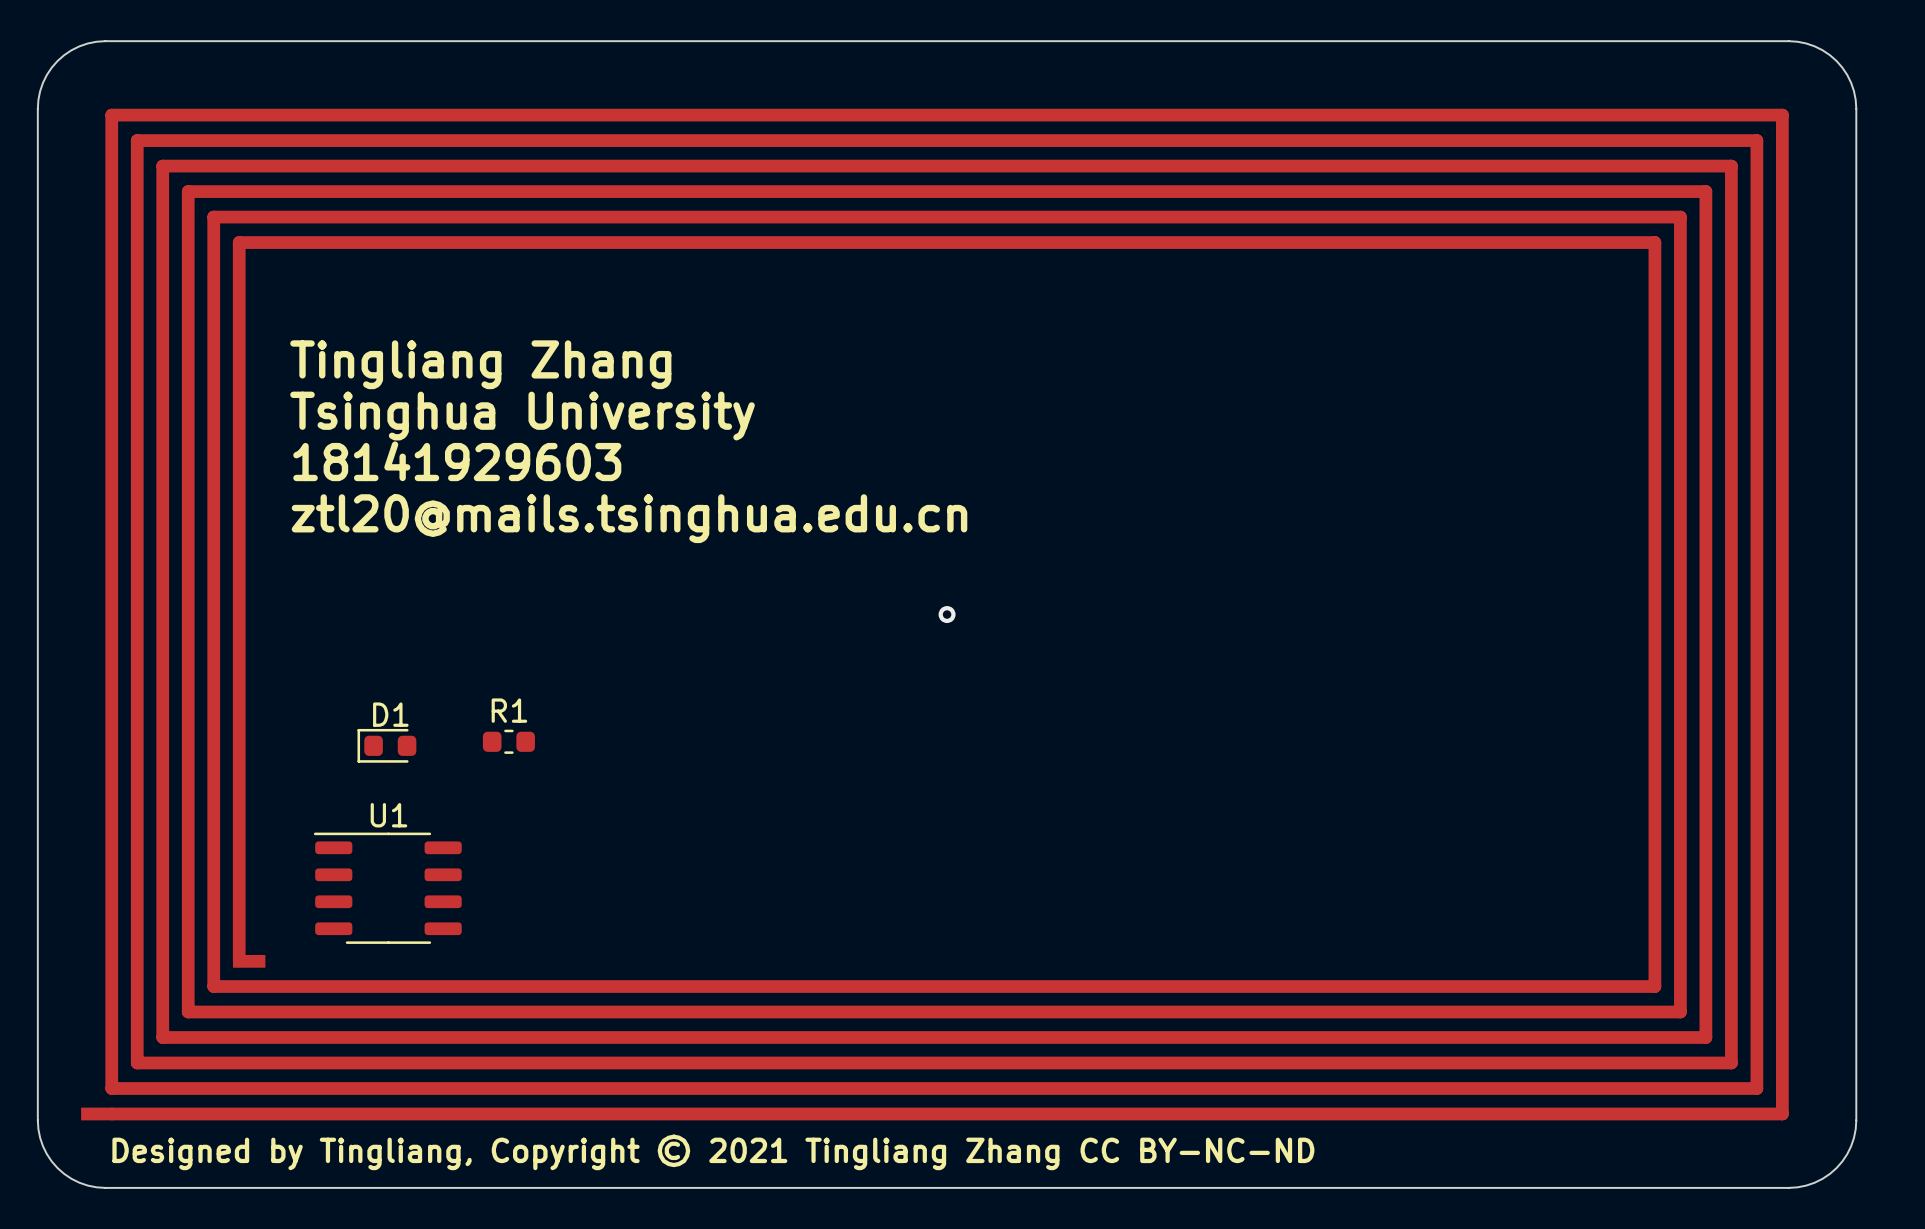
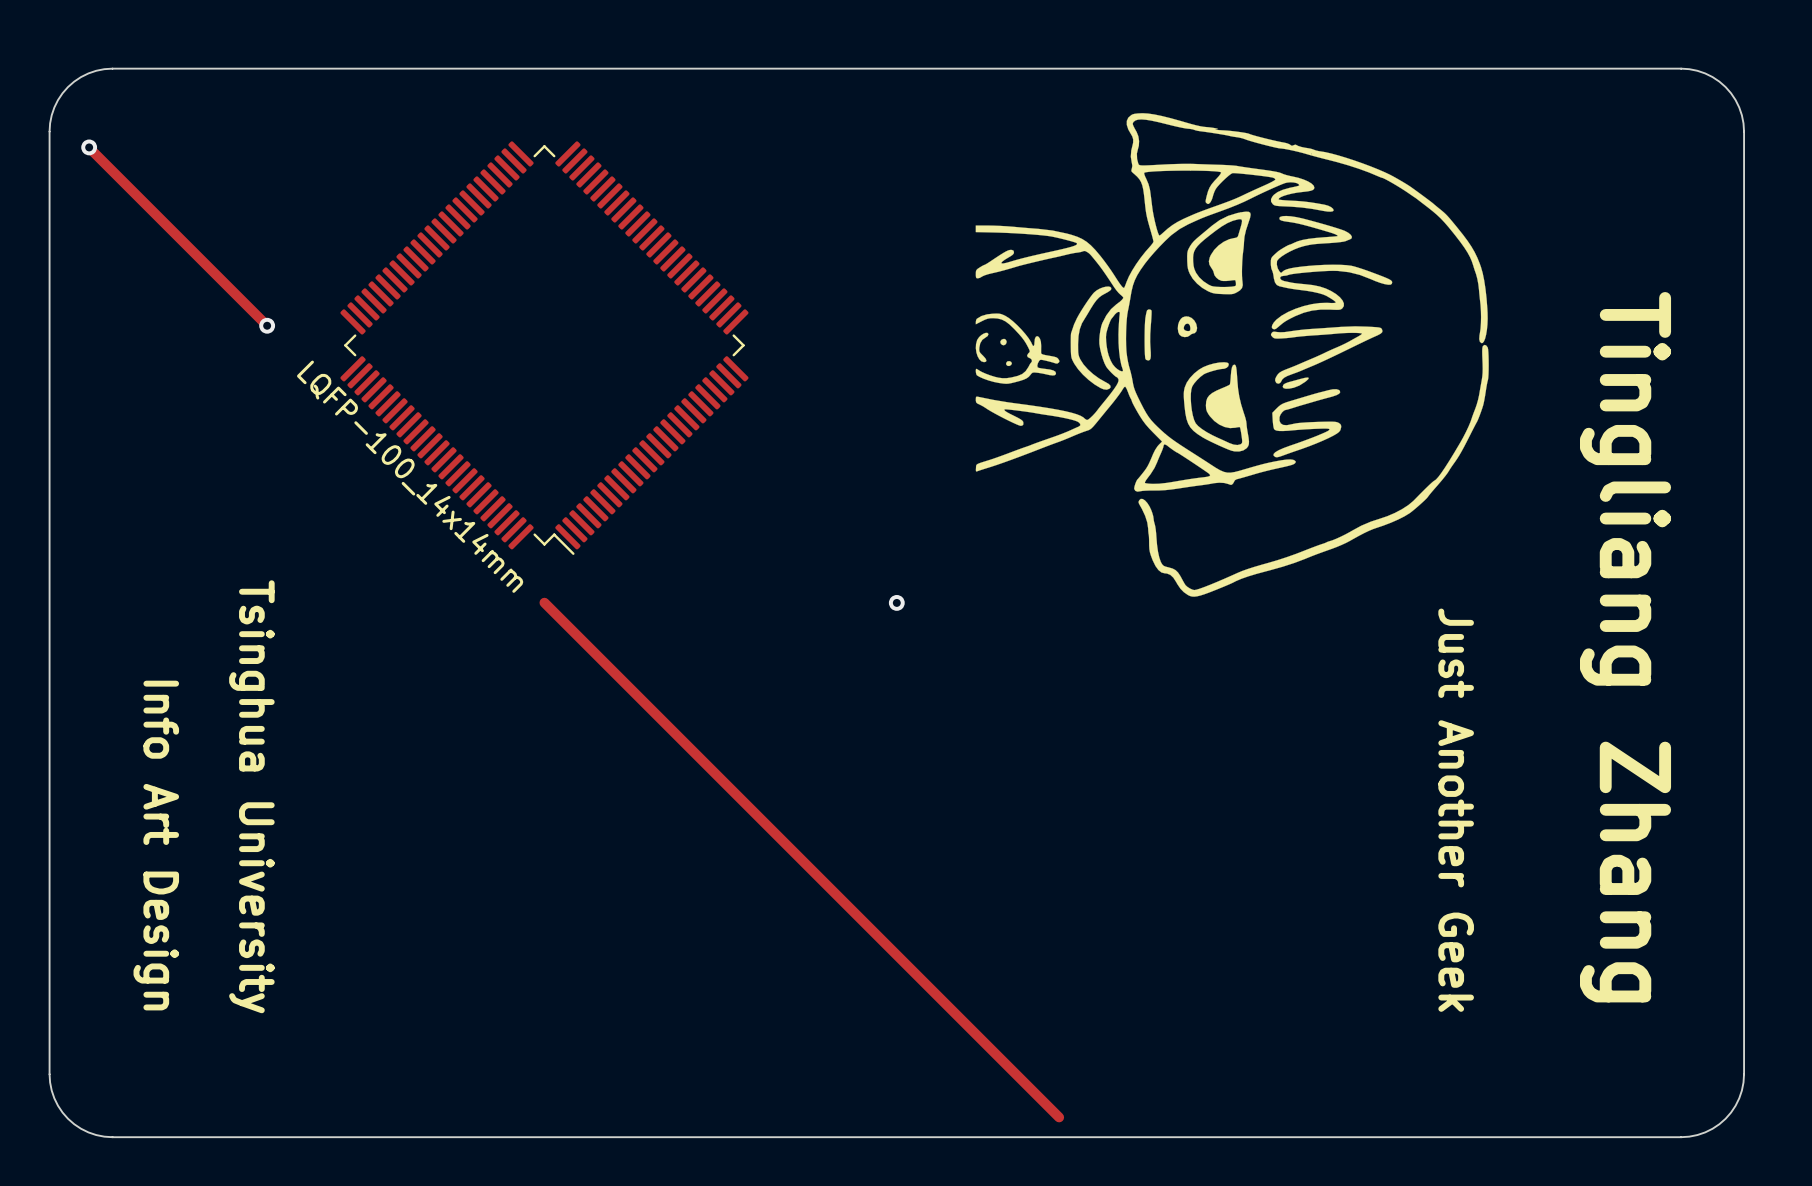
drawing: none -> [975, 113, 1489, 597]
via: none -> (89, 147)
track: none -> (89, 147) (267, 325)
via: none -> (267, 325)
LQFP-100_14x14mm: none -> (544, 348)
text: Tingliang Zhang (480, 364) -> none
text: Tsinghua University (522, 416) -> none
text: 18141929603 (457, 461) -> none
text: ztl20@mails.tsinghua.edu.cn (629, 518) -> none
track: none -> (544, 602) (1059, 1117)
part: (934, 614) -> none
text: none -> Tingliang Zhang (1625, 647)
R1: (508, 741) -> none
D1: (386, 745) -> none
text: none -> Tsinghua University (251, 796)
text: none -> Just Another Geek (1456, 810)
text: none -> Info Art Design (156, 845)
U1: (387, 888) -> none
text: Designed by Tingliang, Copyright © 2021 Tingliang Zhang CC BY-NC-ND (713, 1152) -> none

